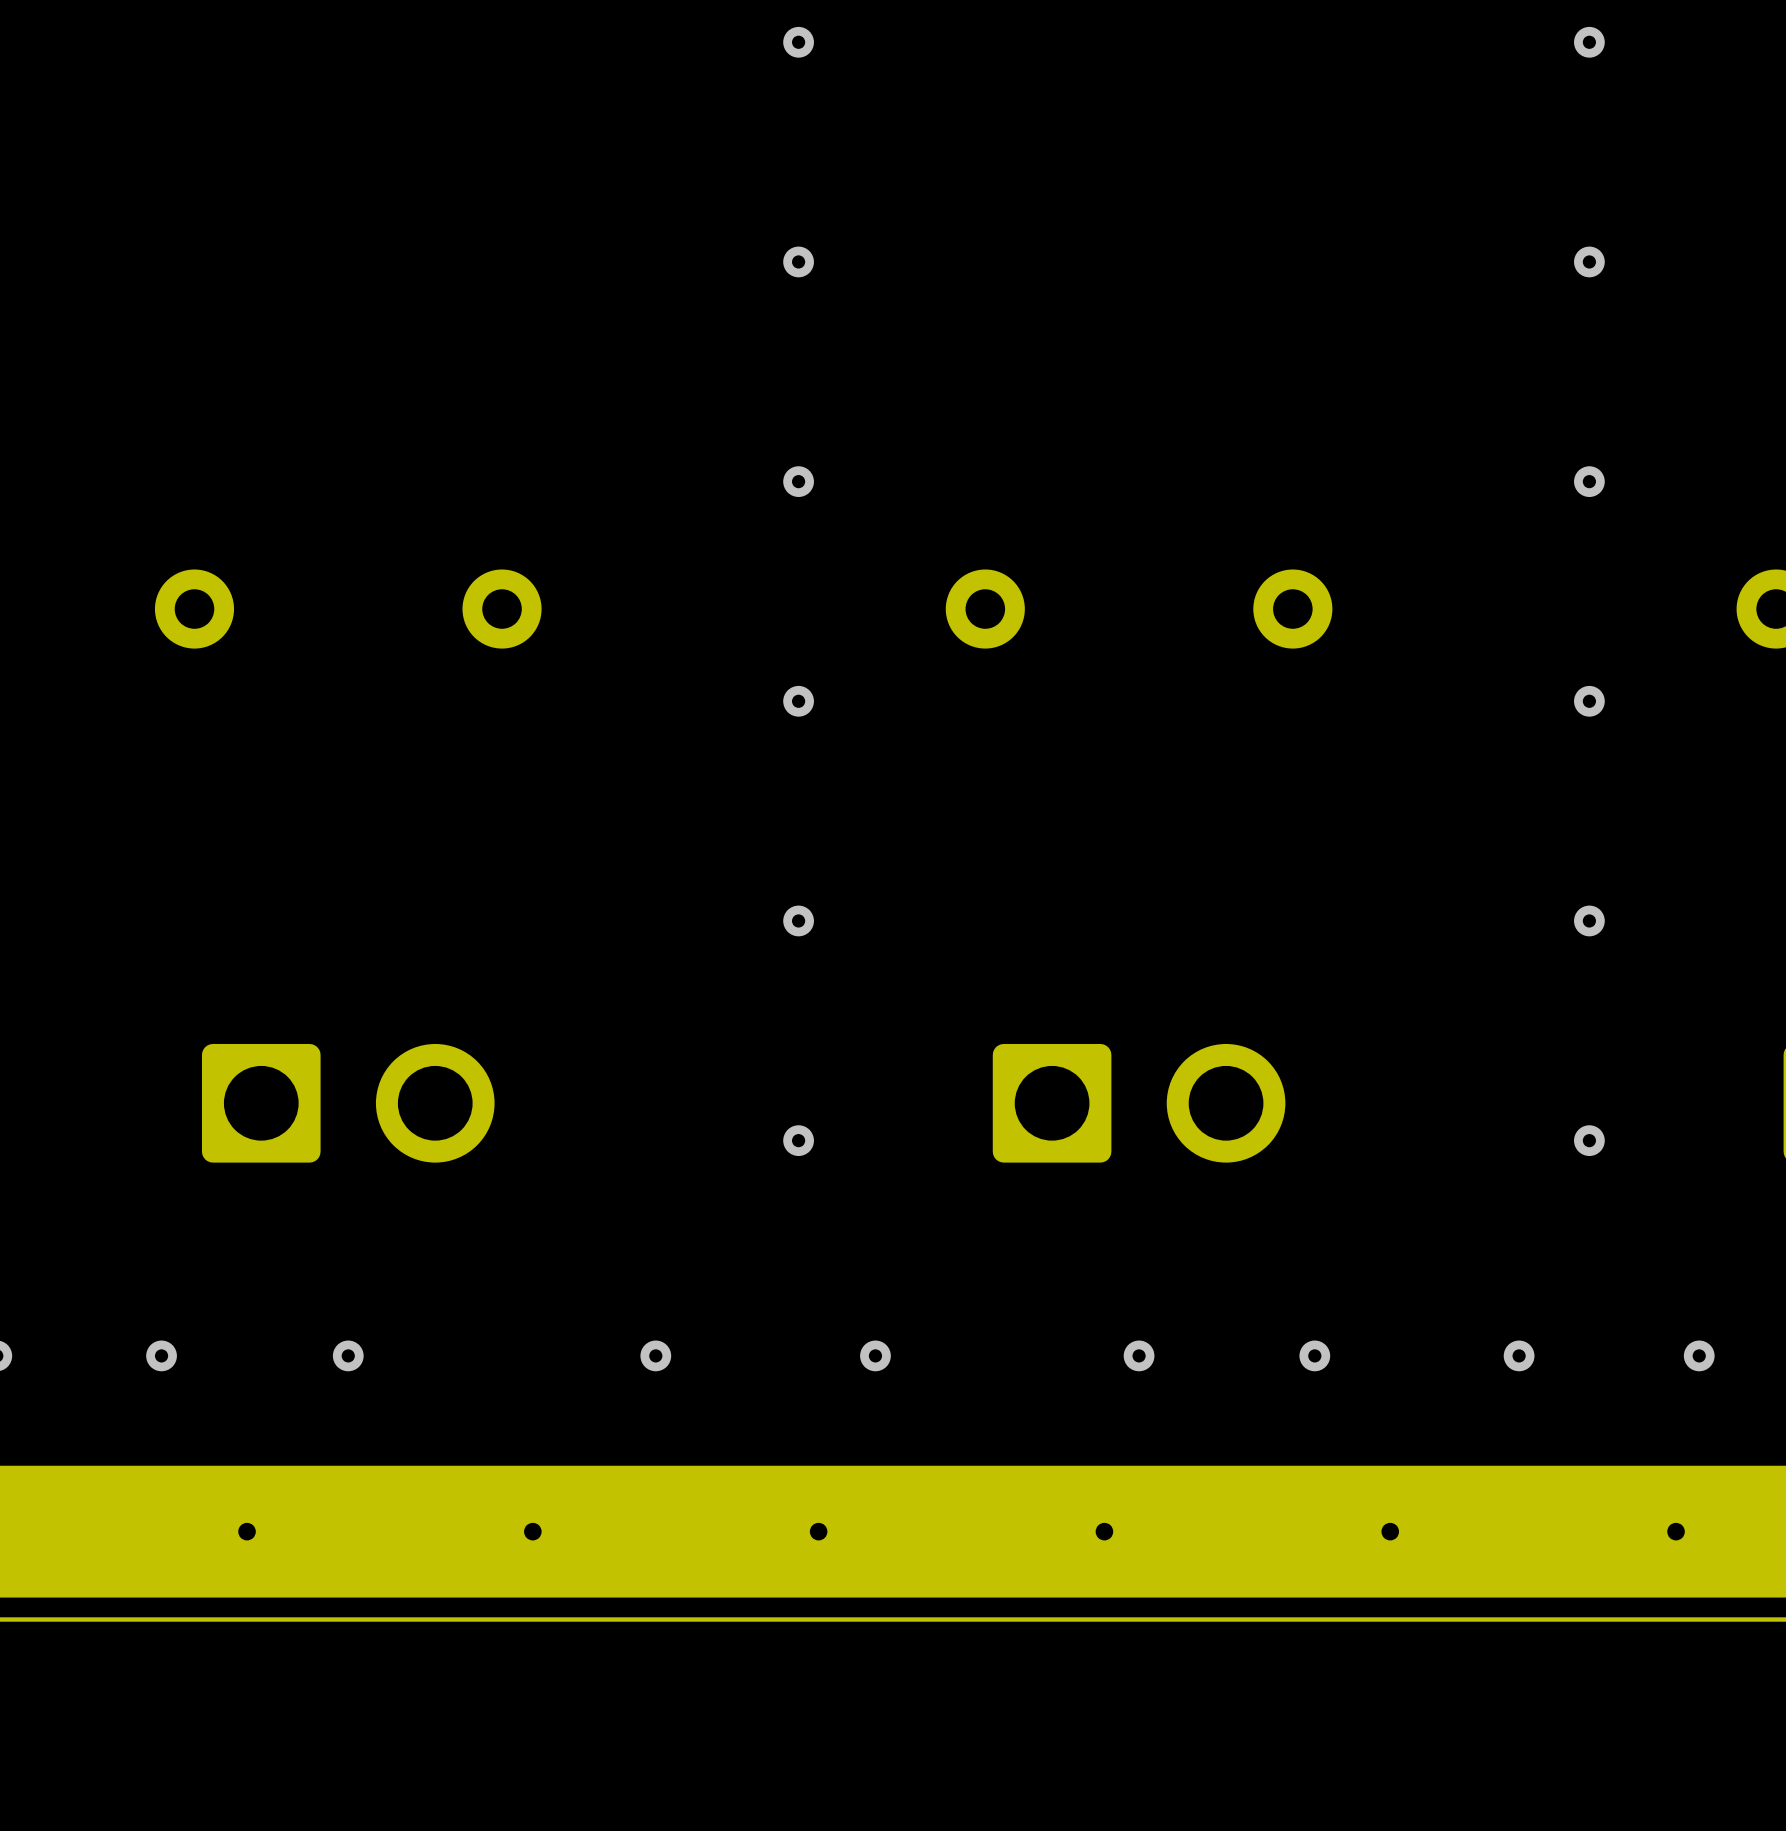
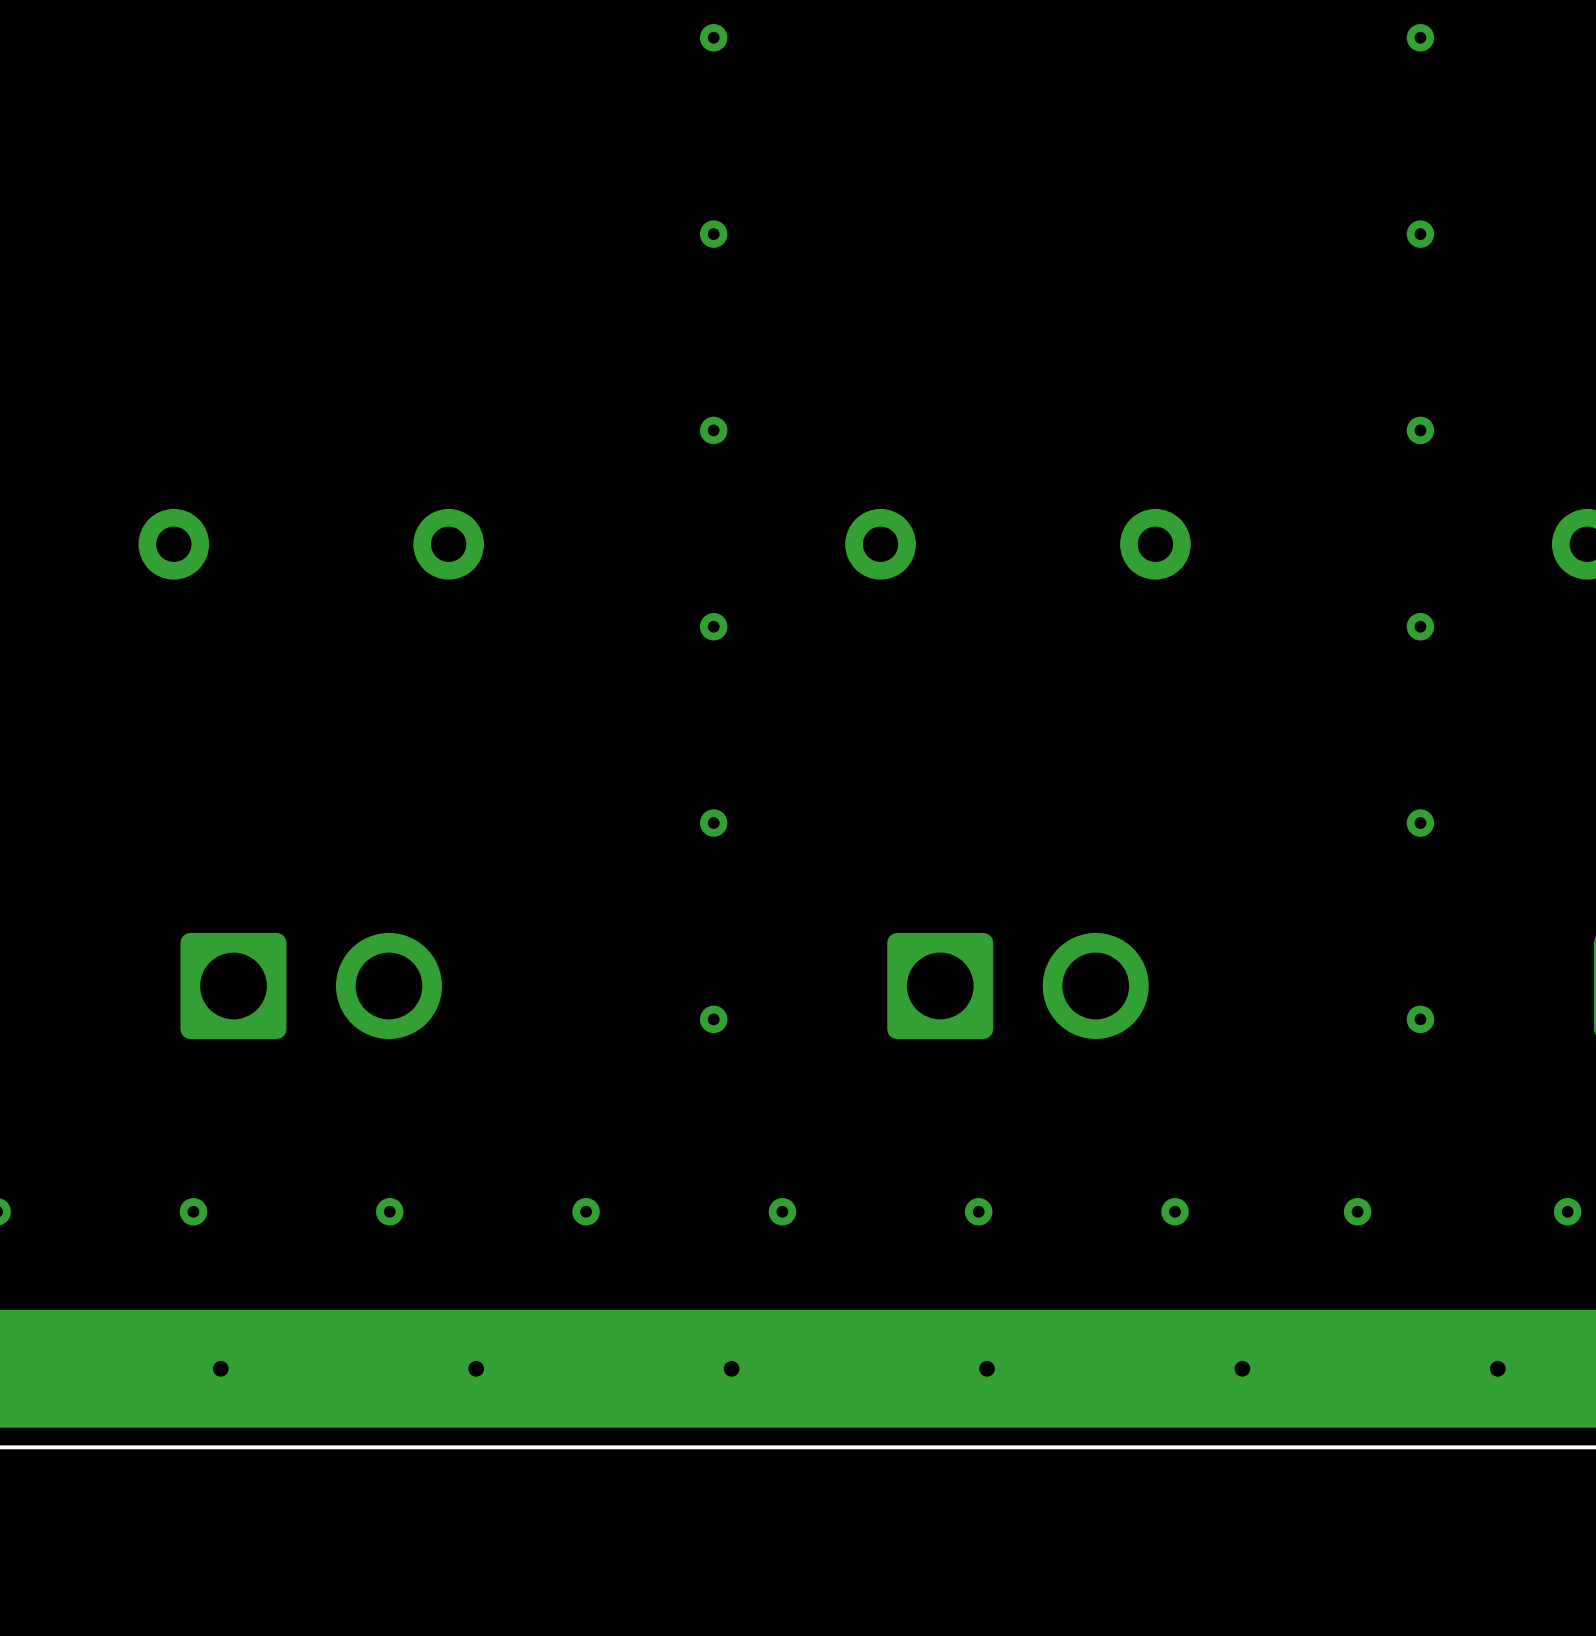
via position: (161, 1355) -> (193, 1211)
via: (348, 1355) -> none
via: none -> (389, 1211)
via position: (1139, 1355) -> (978, 1211)
via position: (1699, 1355) -> (1567, 1211)

